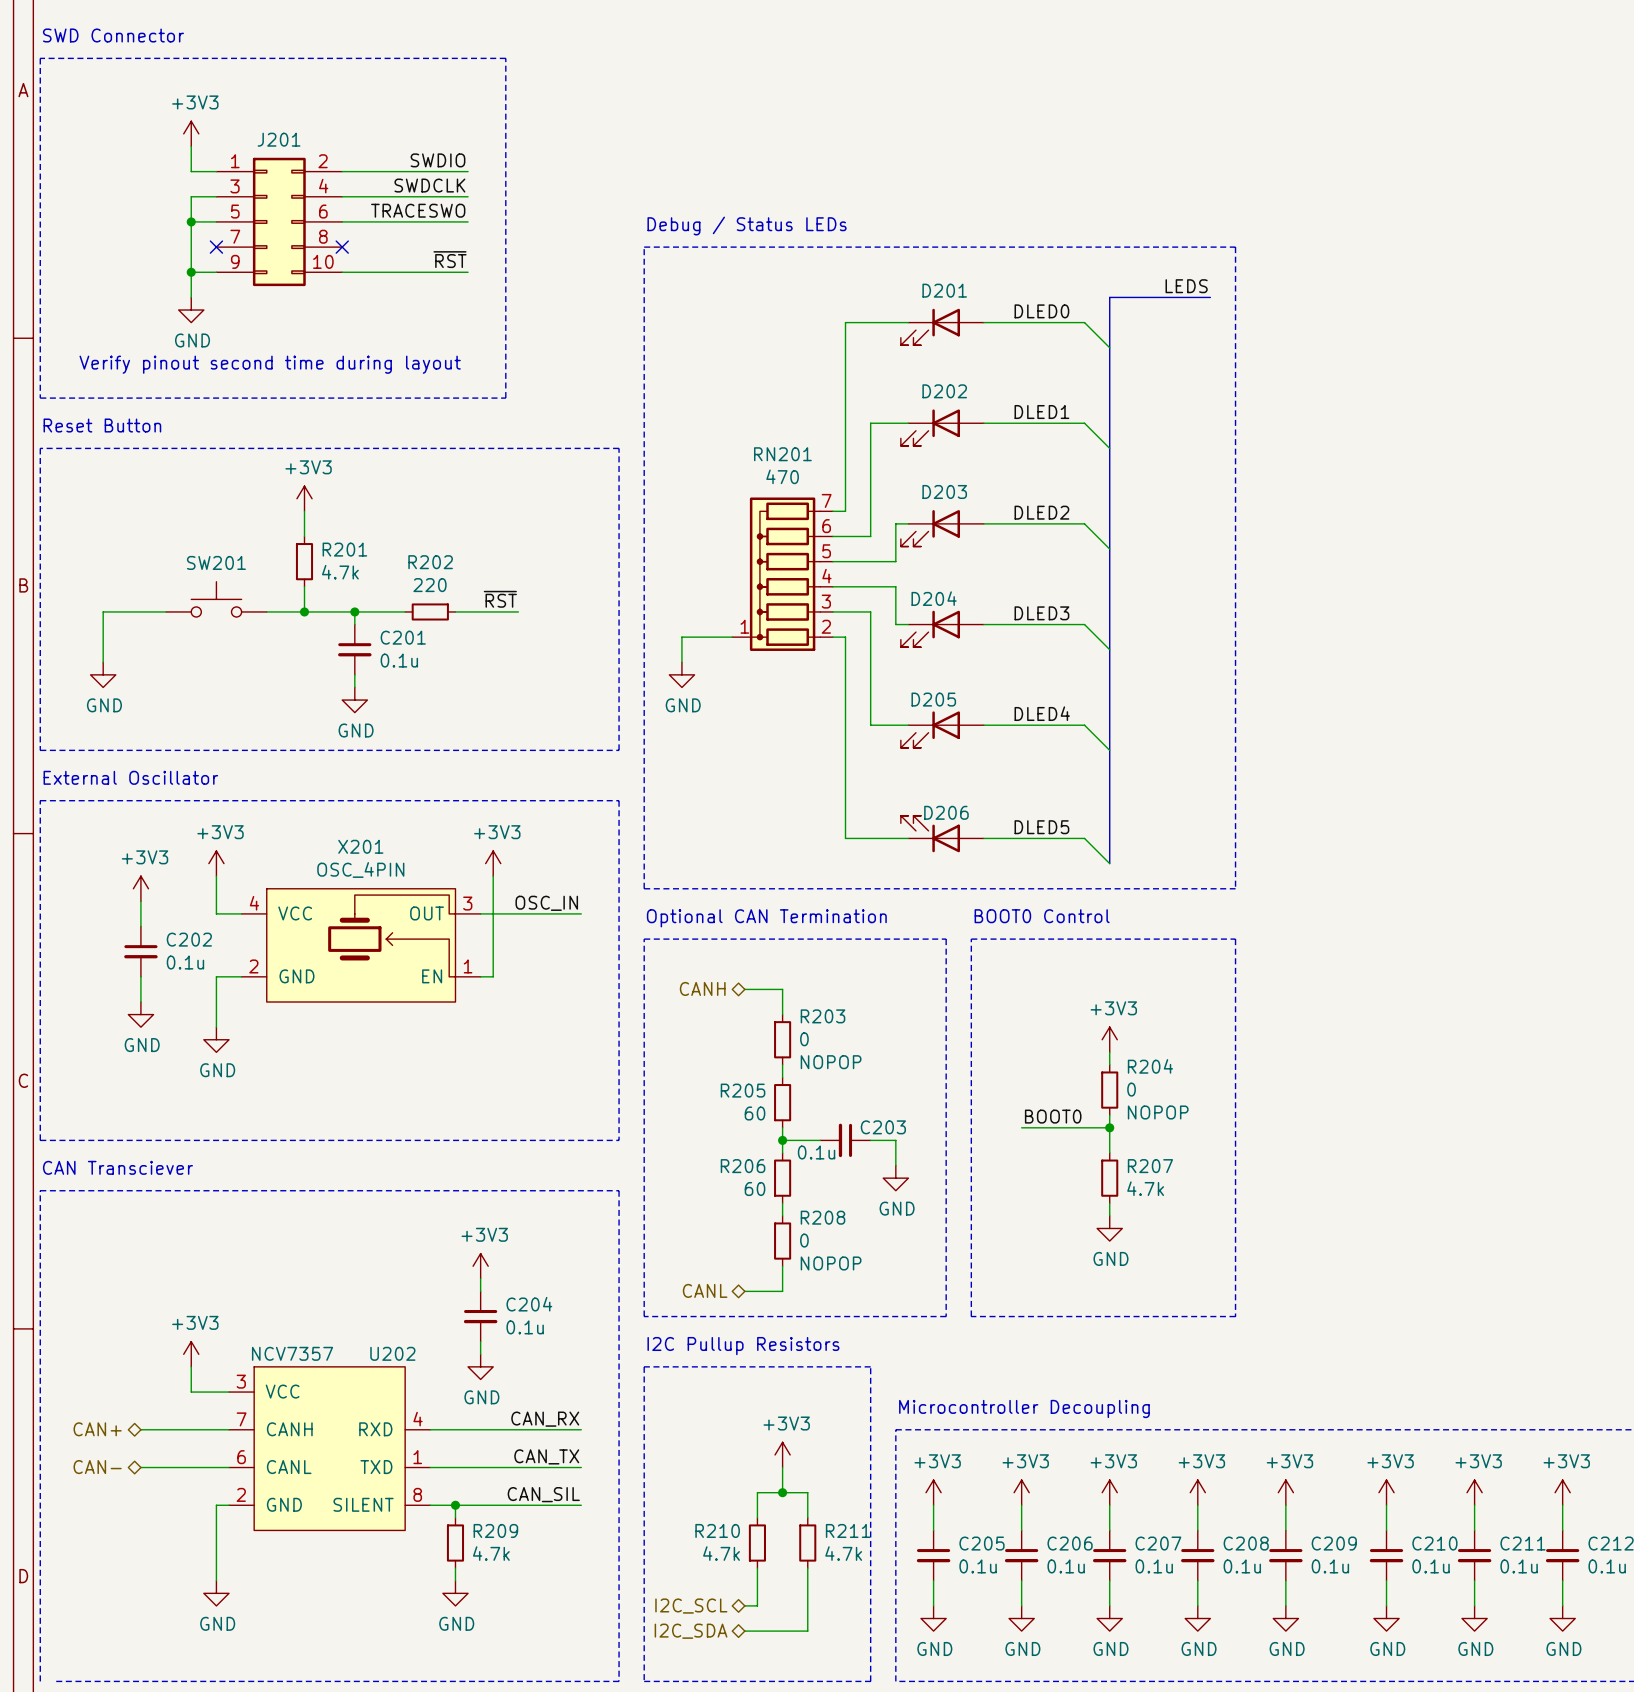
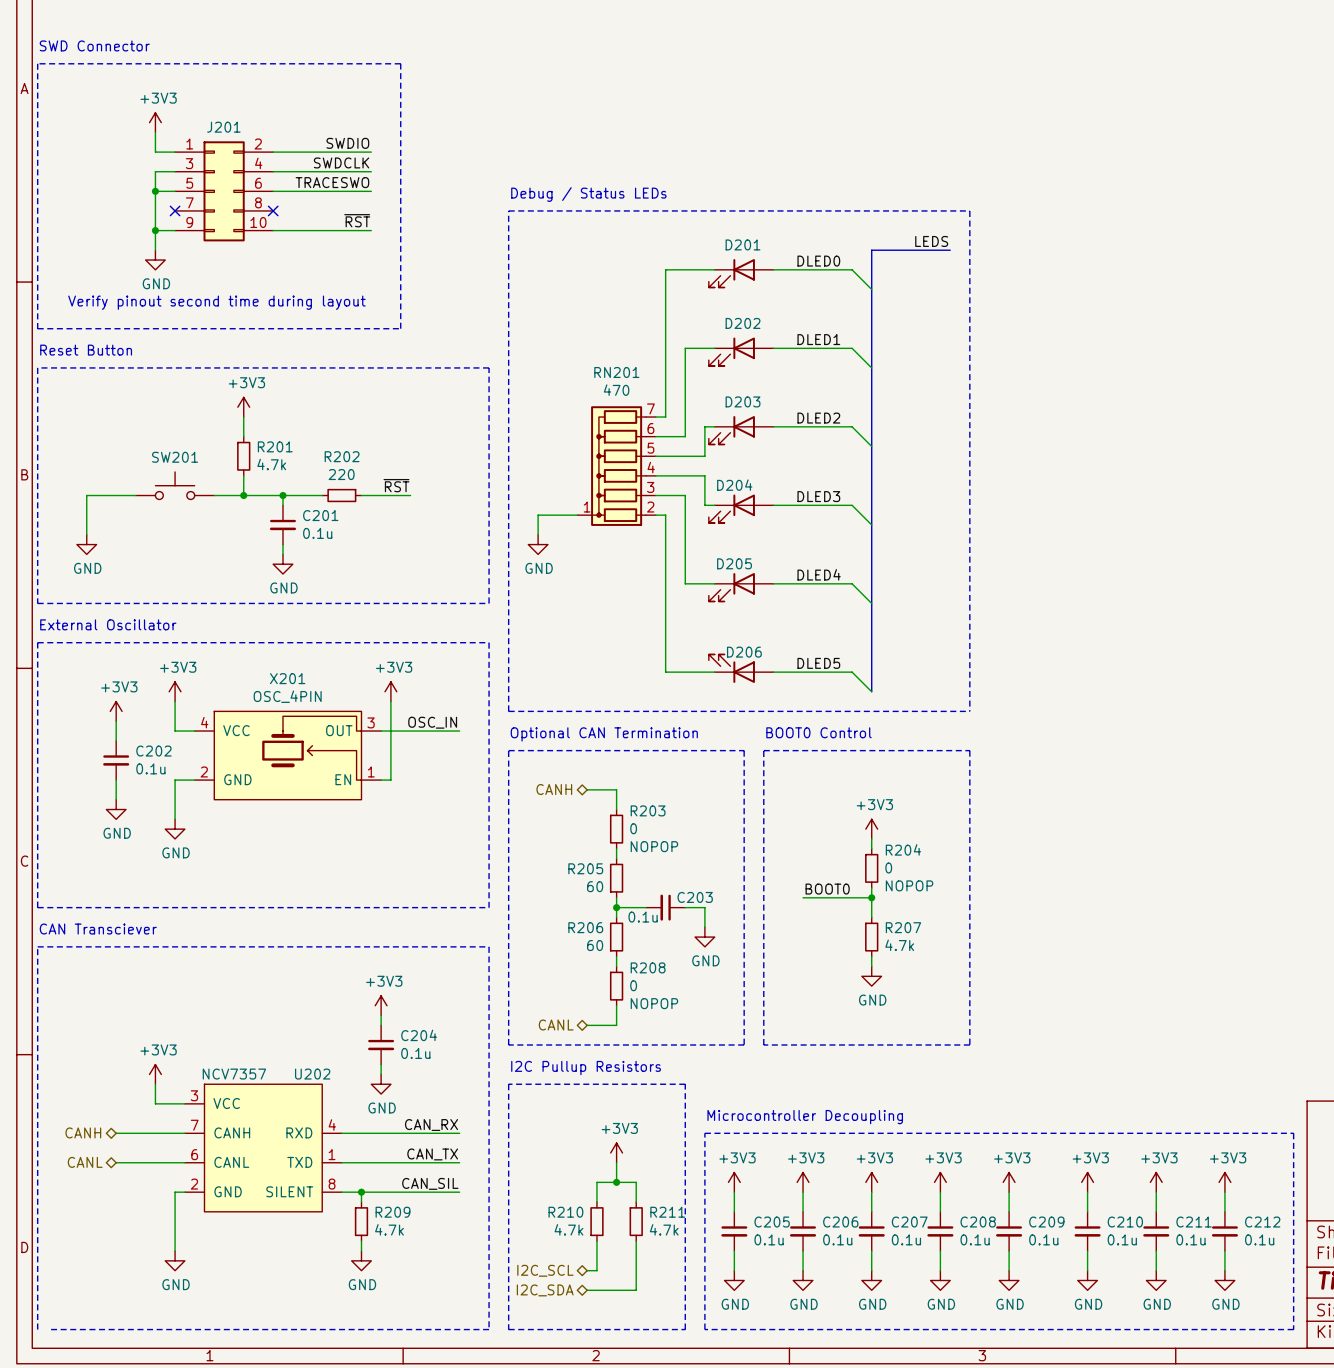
hierarchical label: CAN+ (97, 1429) -> CANH (83, 1132)
hierarchical label: CAN- (97, 1467) -> CANL (85, 1162)

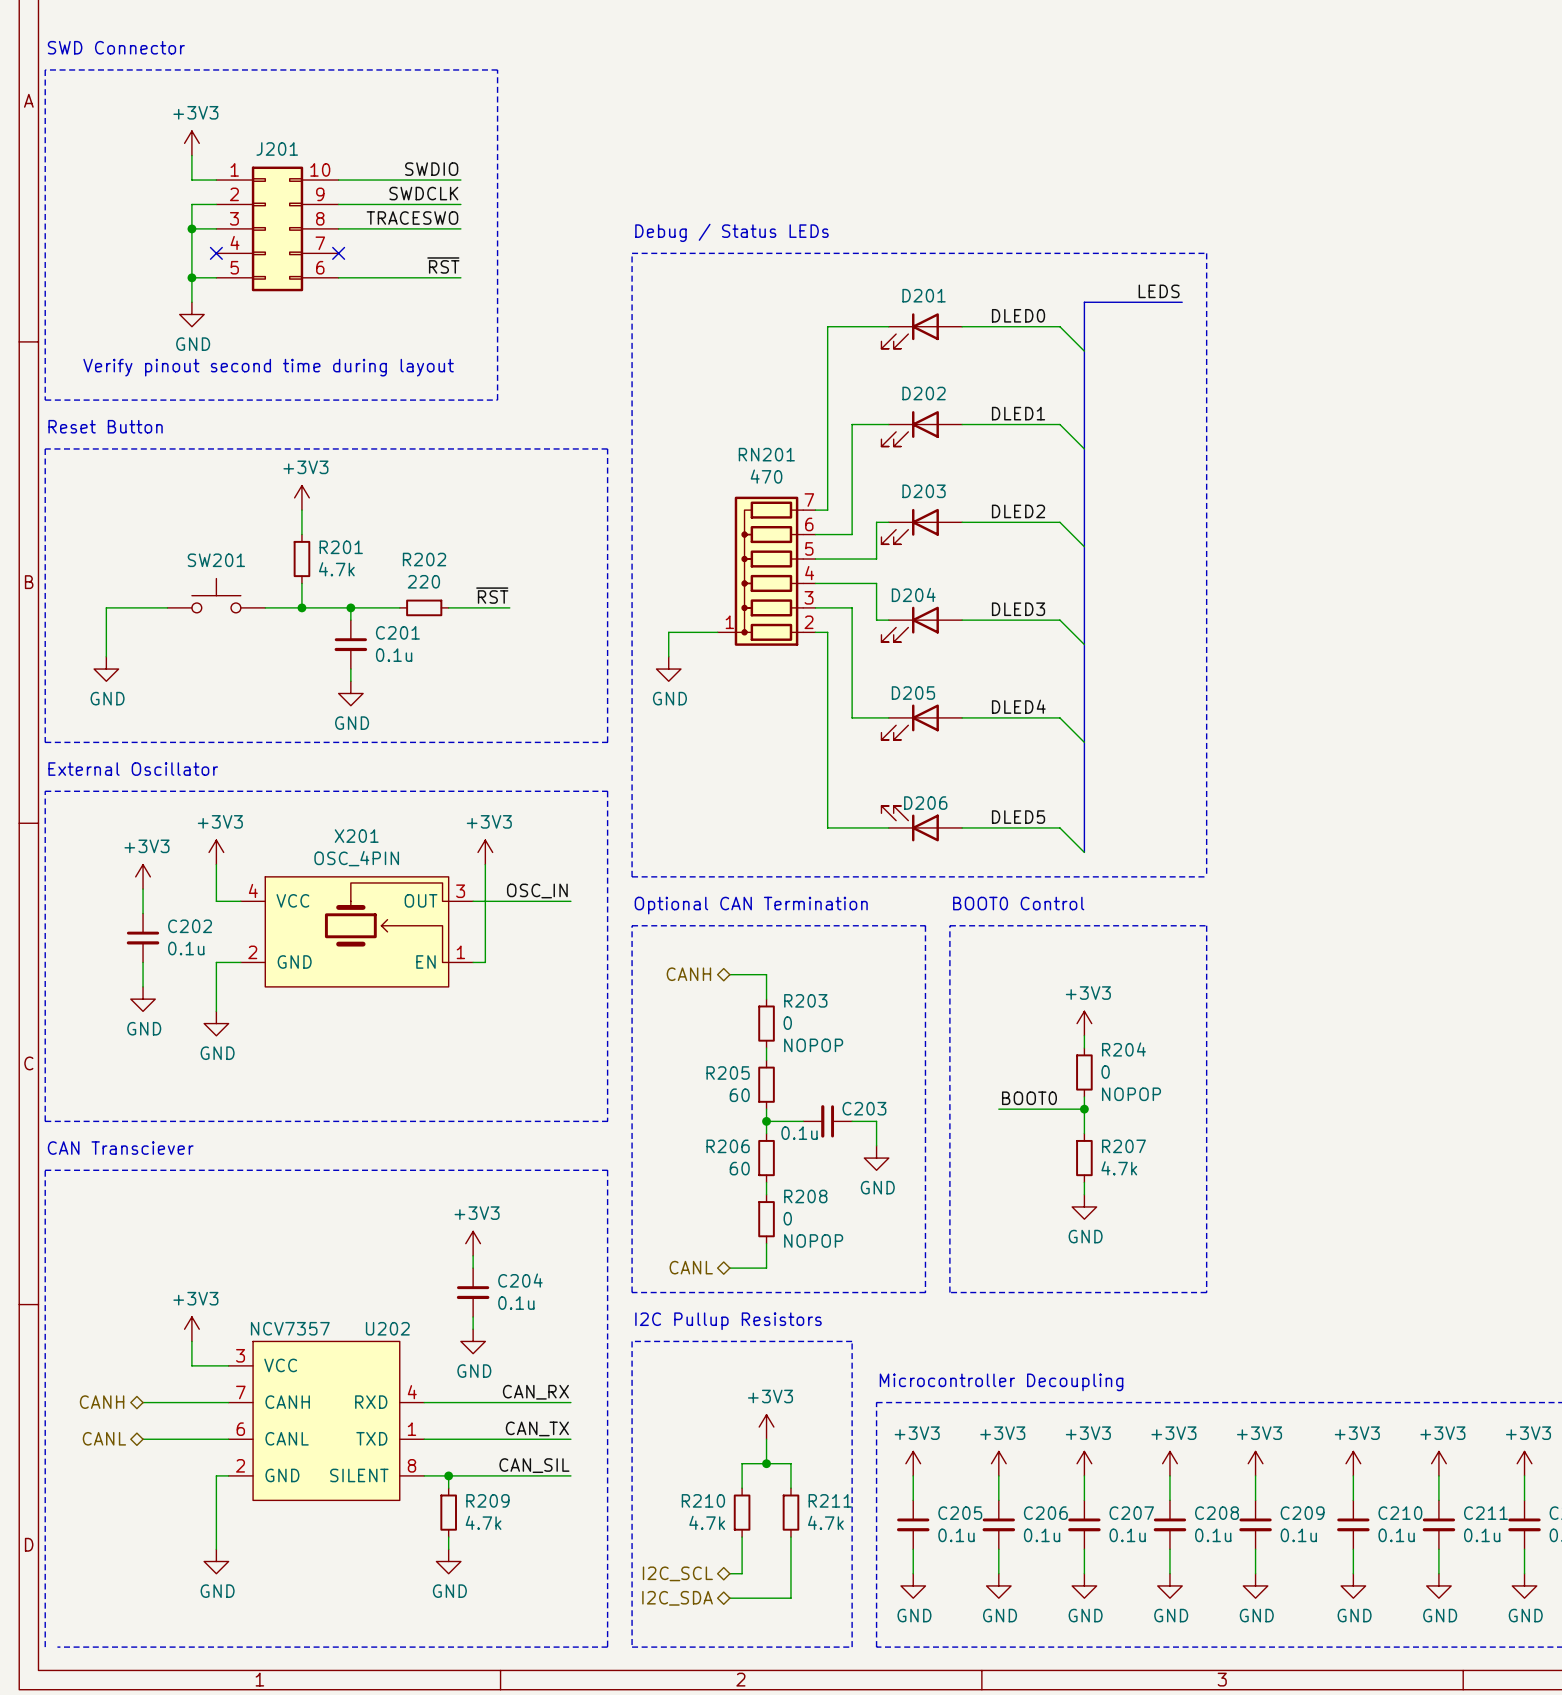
J201 symbol: [175, 141, 274, 242] -> [216, 166, 339, 292]

